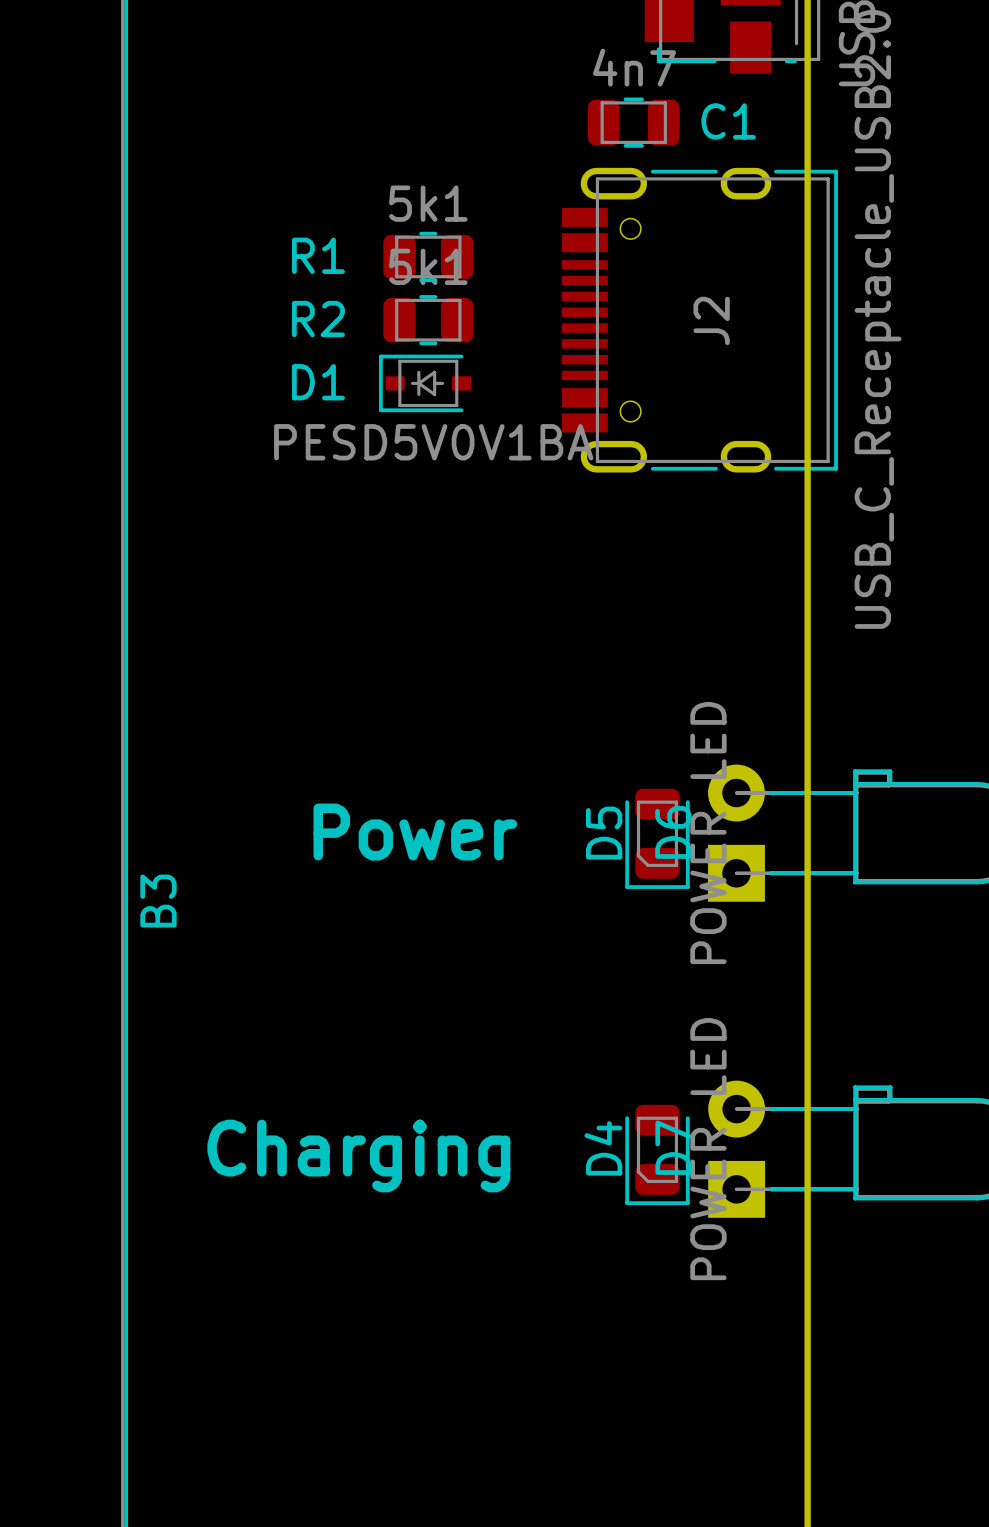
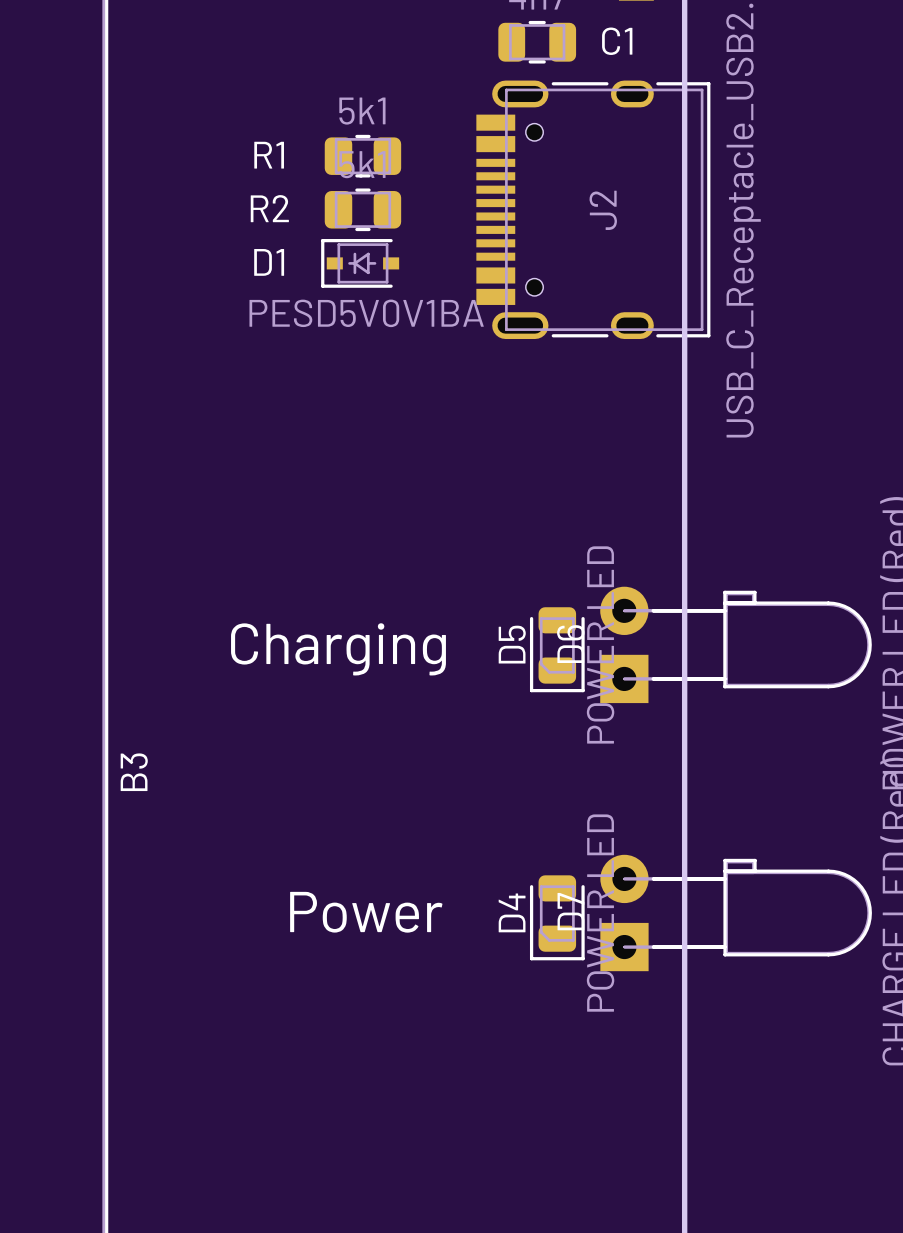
text: Power (415, 832) -> Charging (338, 649)
B3 name position: B3 (158, 900) -> B3 (134, 772)
text: Charging (358, 1155) -> Power (366, 912)

